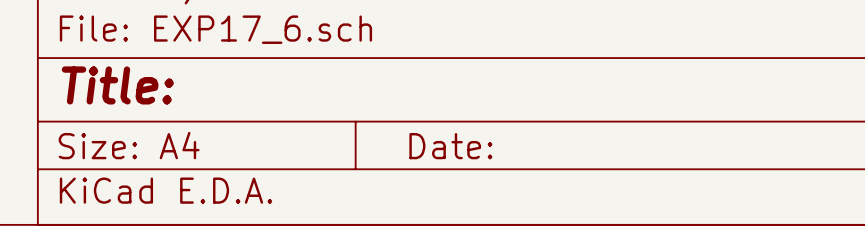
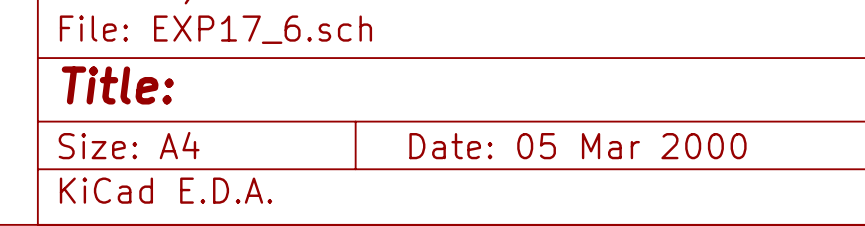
title block: Date: (450, 146) -> Date: 05 Mar 2000 (578, 146)

